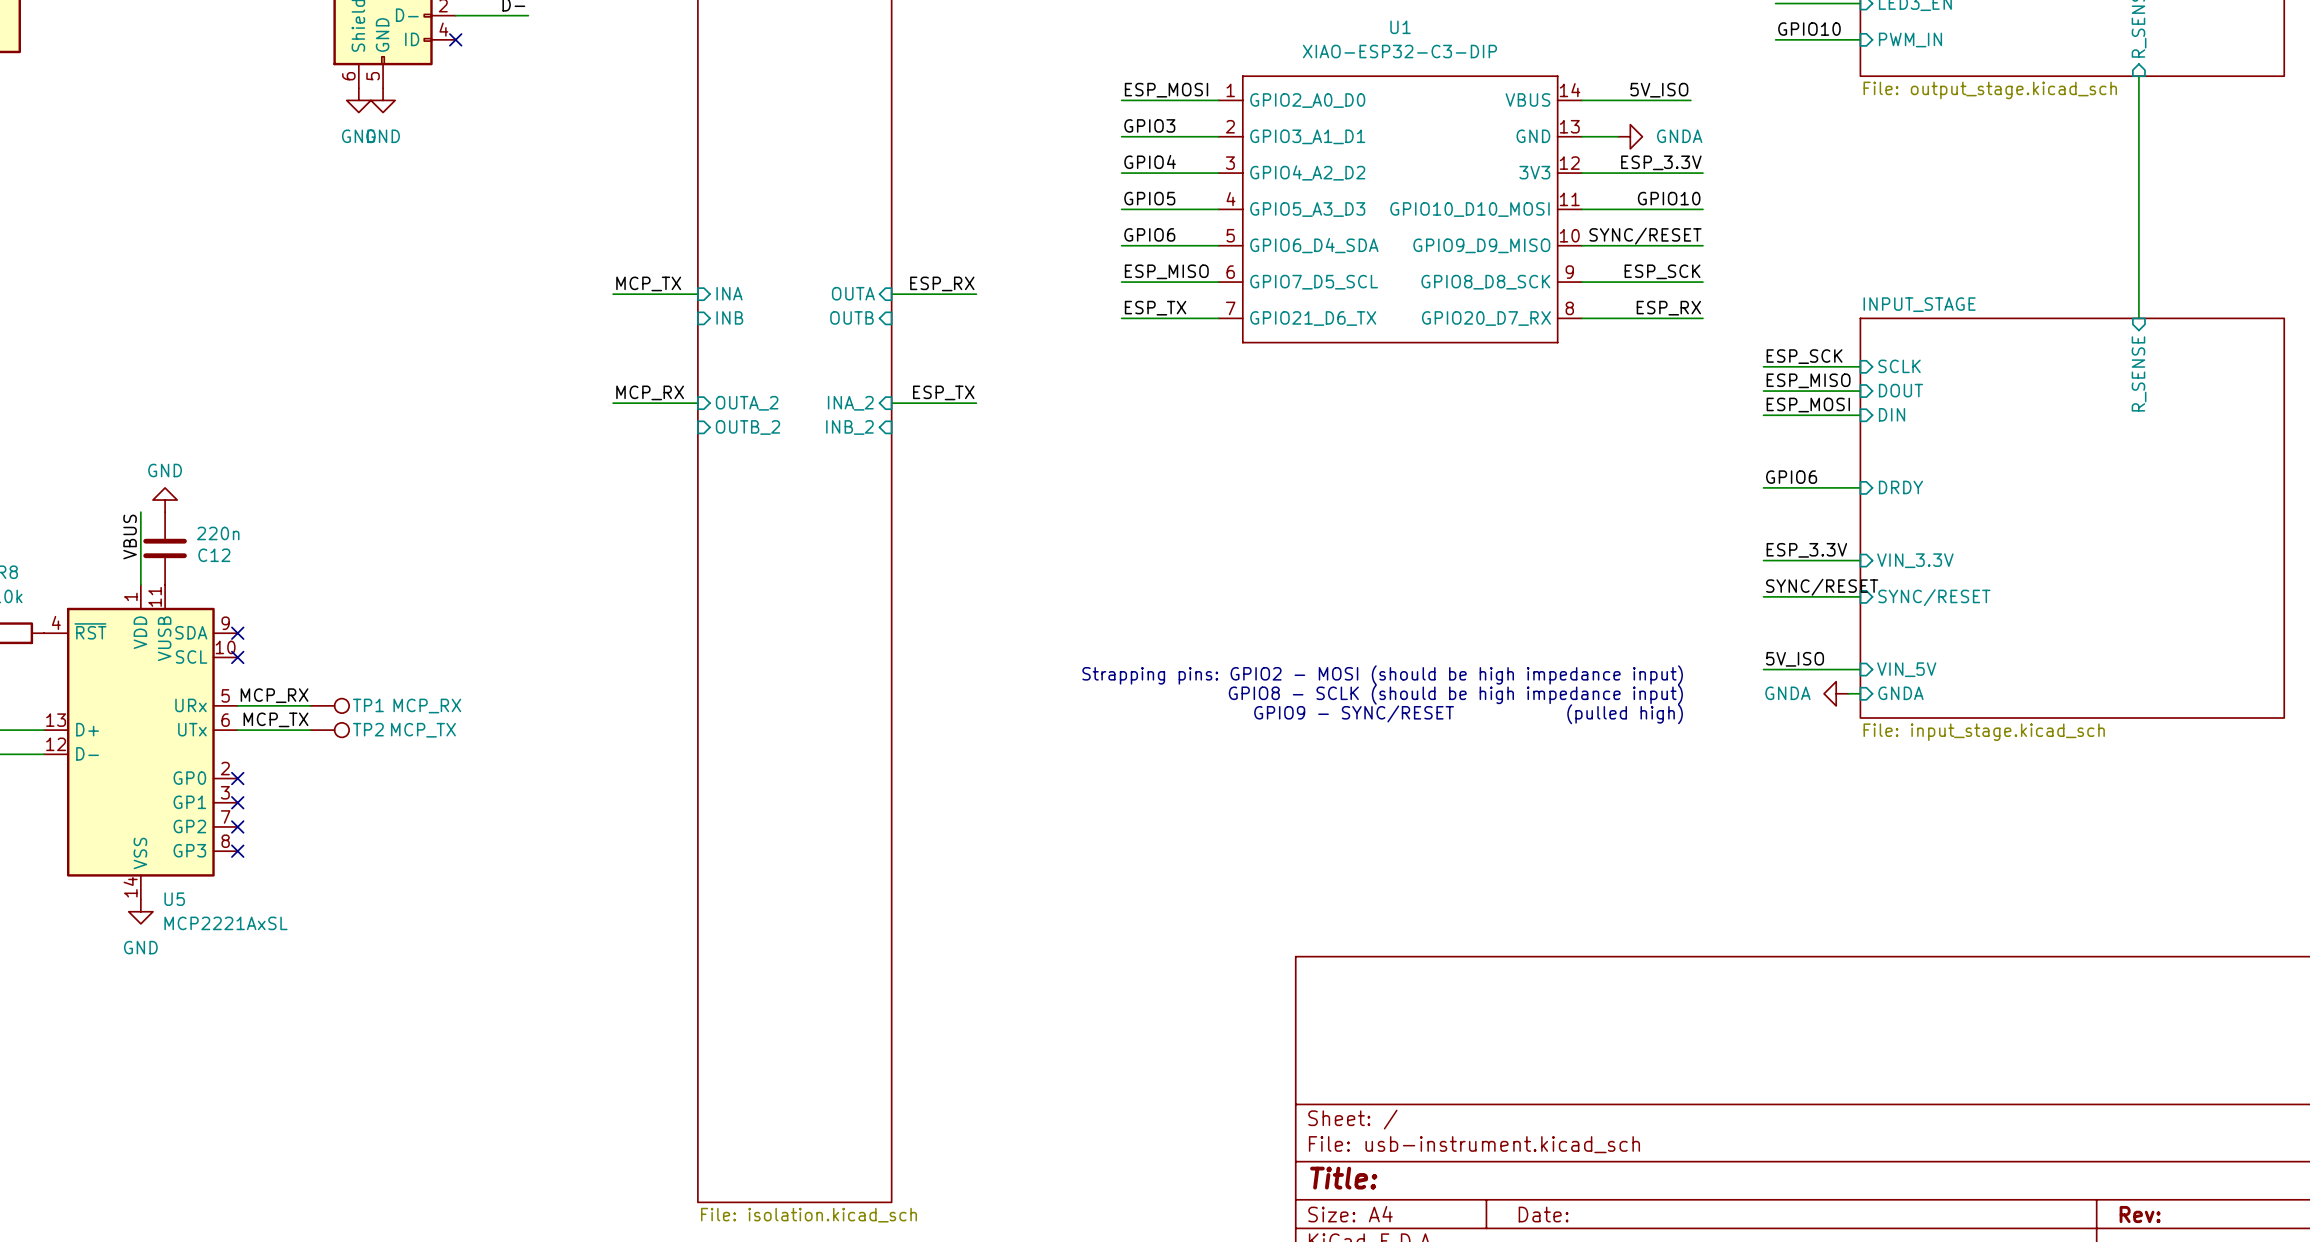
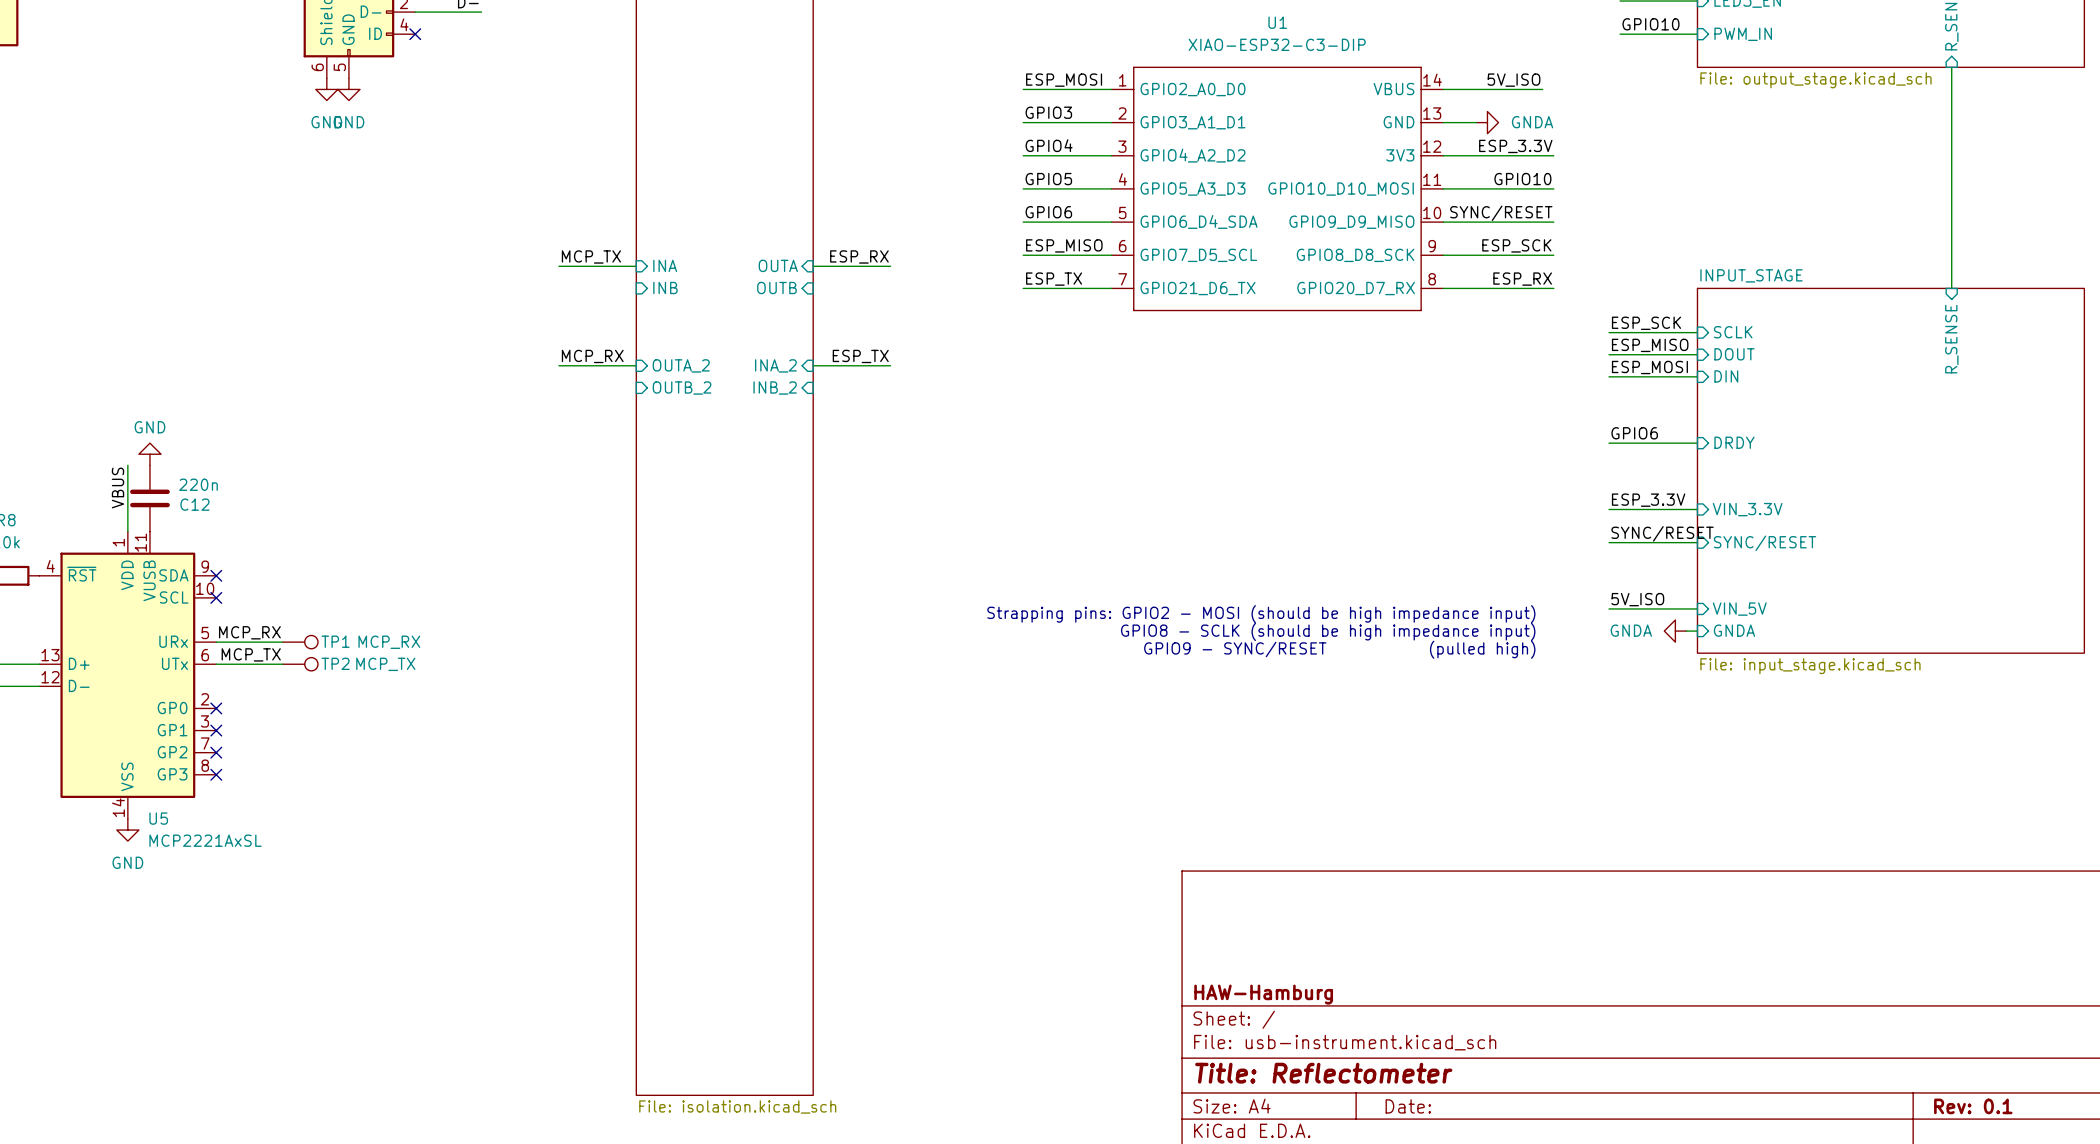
title block: none -> HAW-Hamburg (1263, 994)
title block: Title: (1343, 1178) -> Title: Reflectometer (1323, 1073)
title block: Rev: (2140, 1214) -> Rev: 0.1 (1973, 1106)

